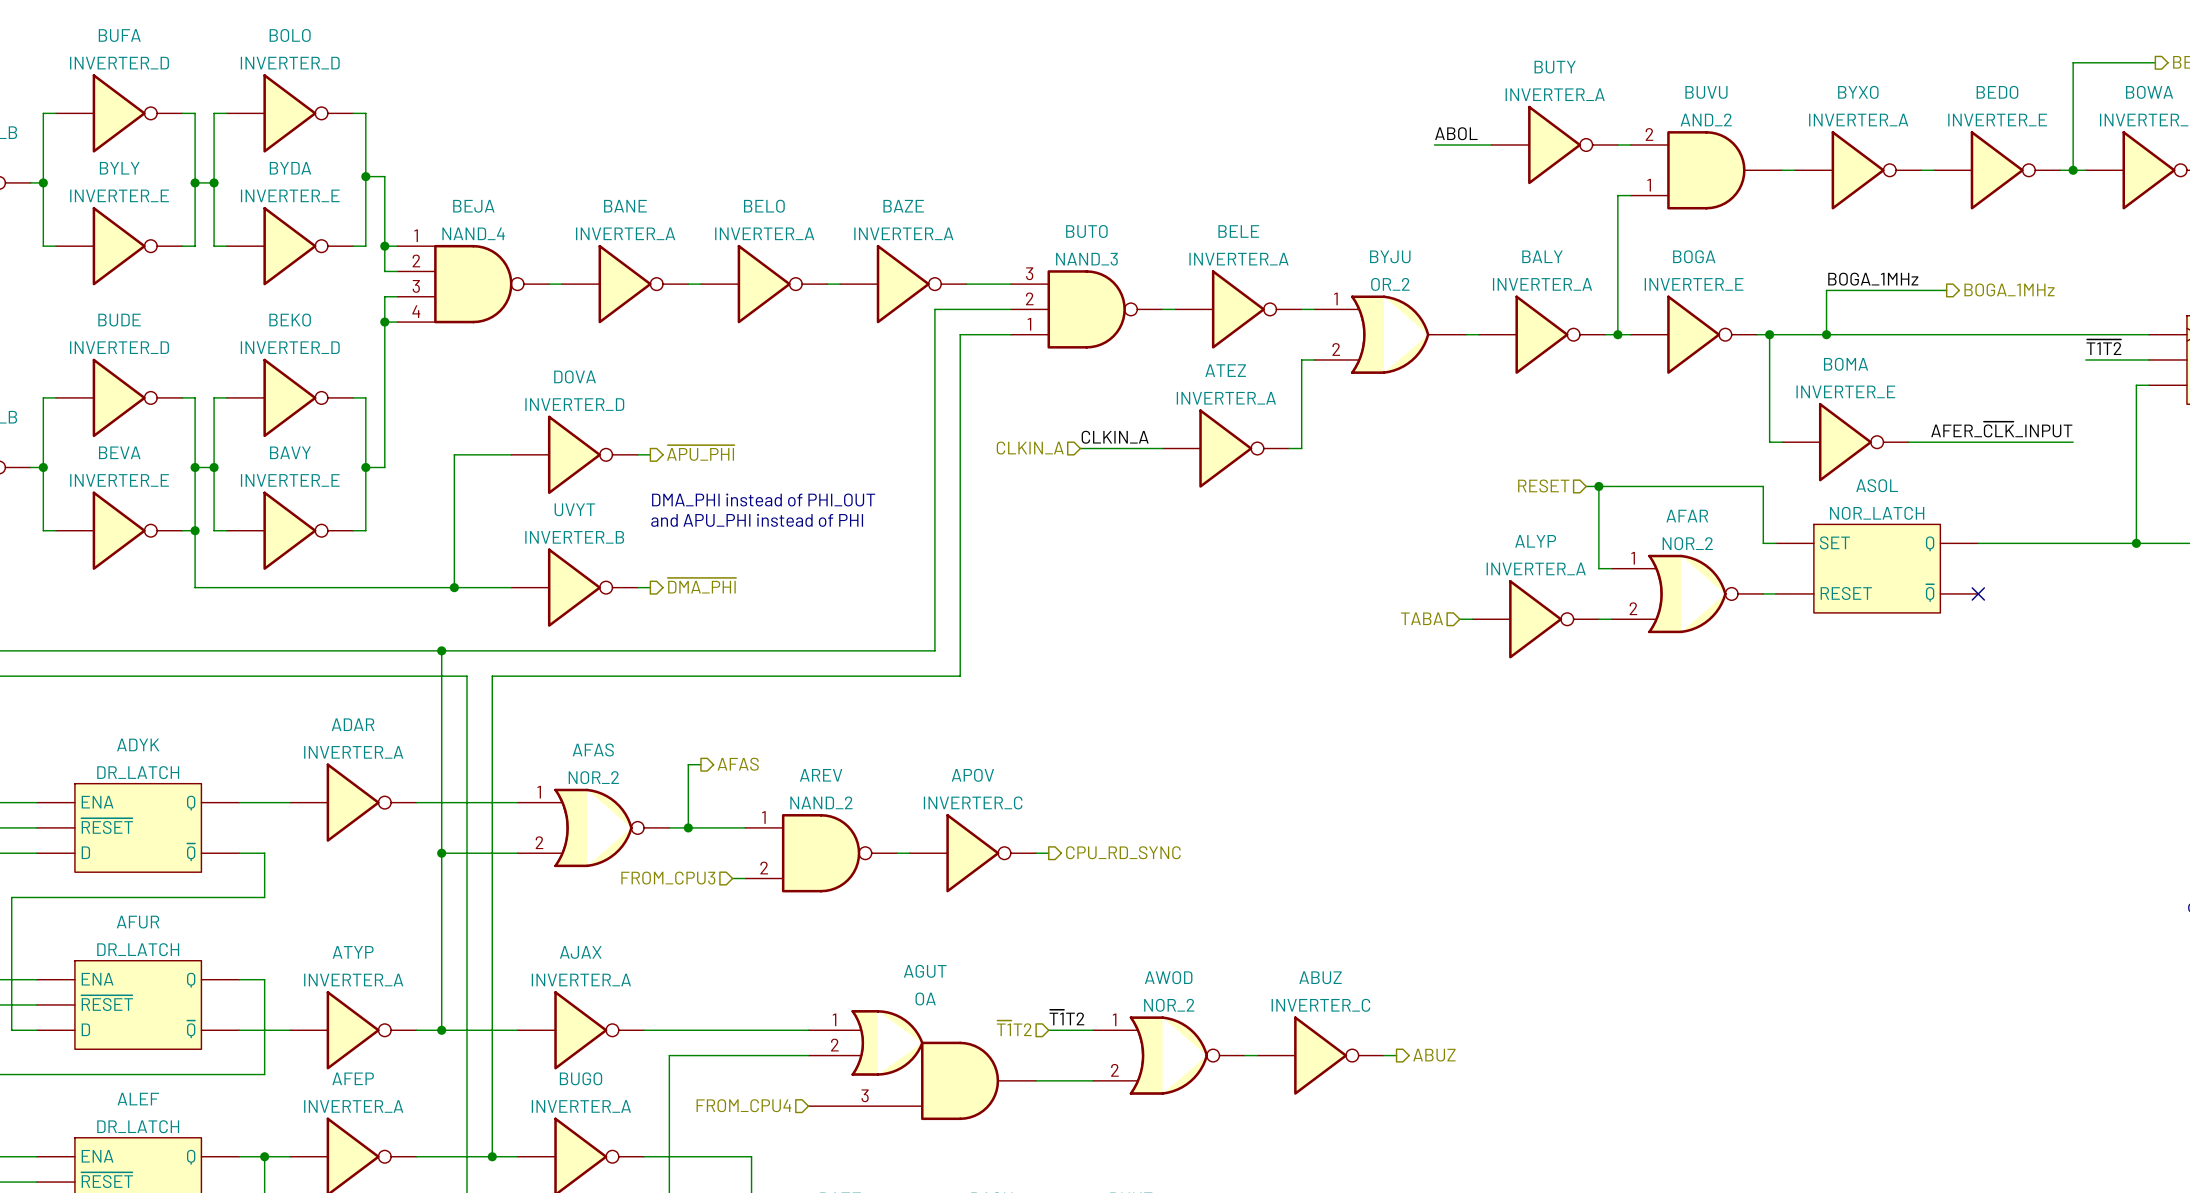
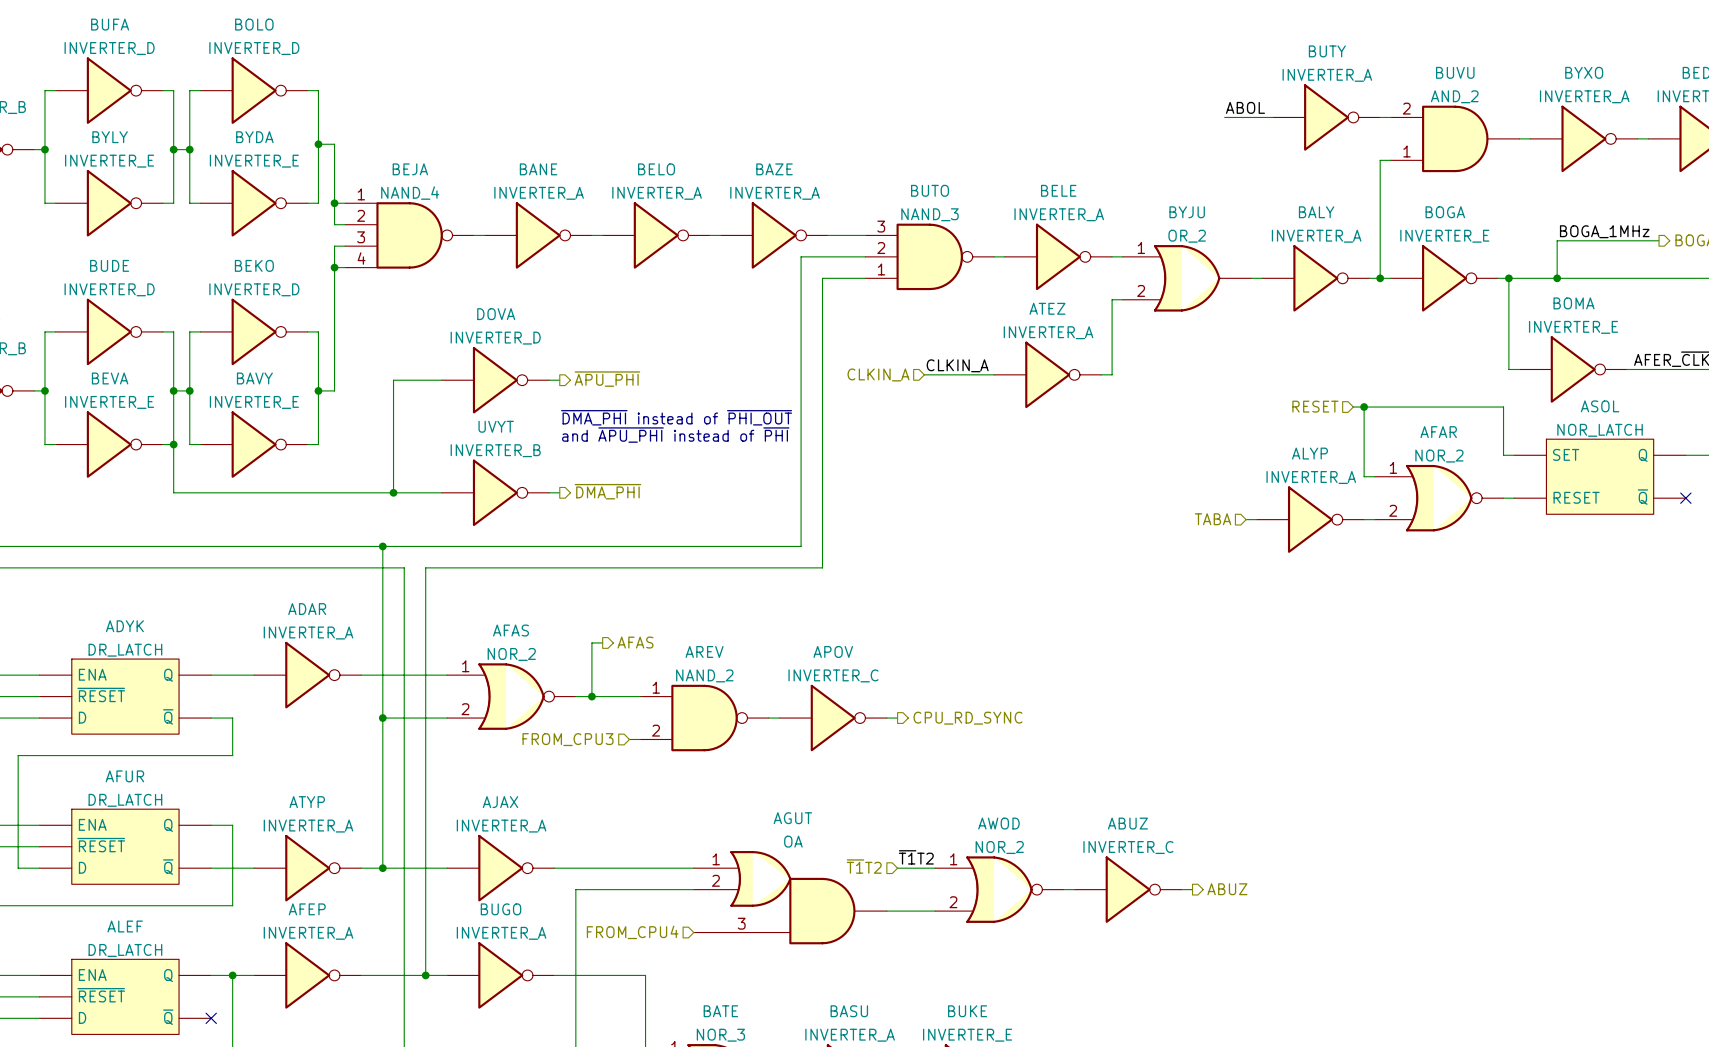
text: DMA_PHI instead of PHI_OUT (763, 499) -> ~{DMA_PHI} instead of ~{PHI_OUT} (676, 417)
text: and APU_PHI instead of PHI (757, 520) -> and ~{APU_PHI} instead of ~{PHI} (675, 435)

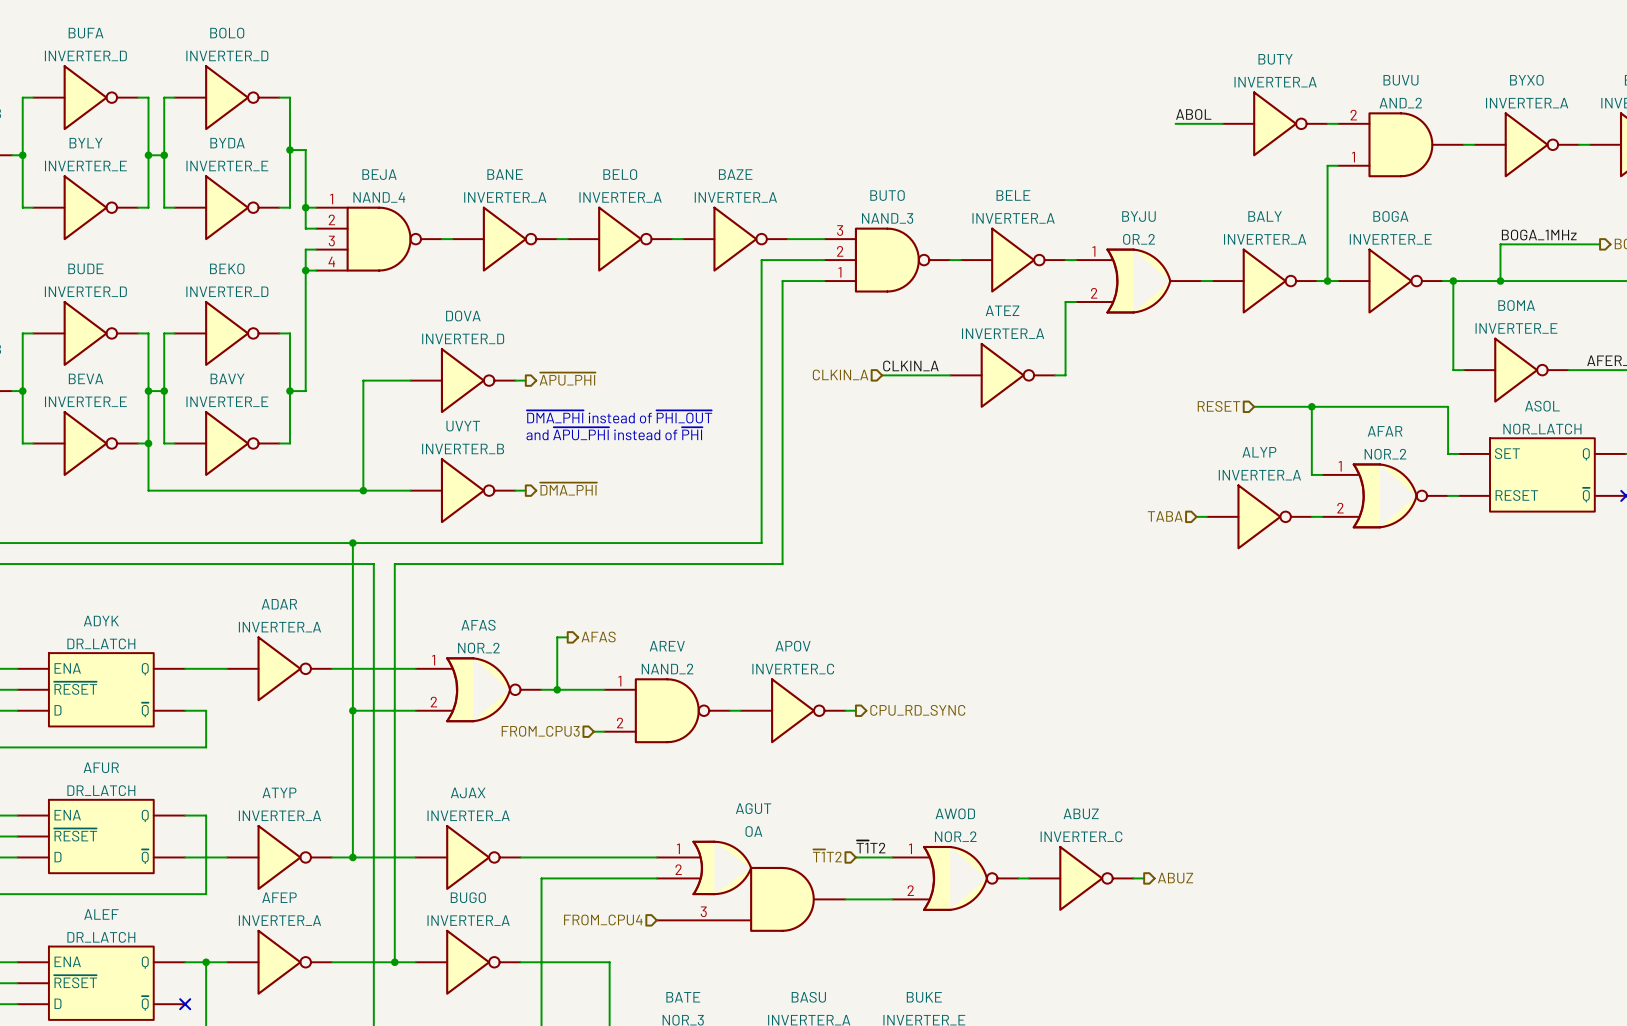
hierarchical label position: RESET (1315, 406) -> RESET (1219, 406)
wire: none -> (1254, 406) (1301, 406)

